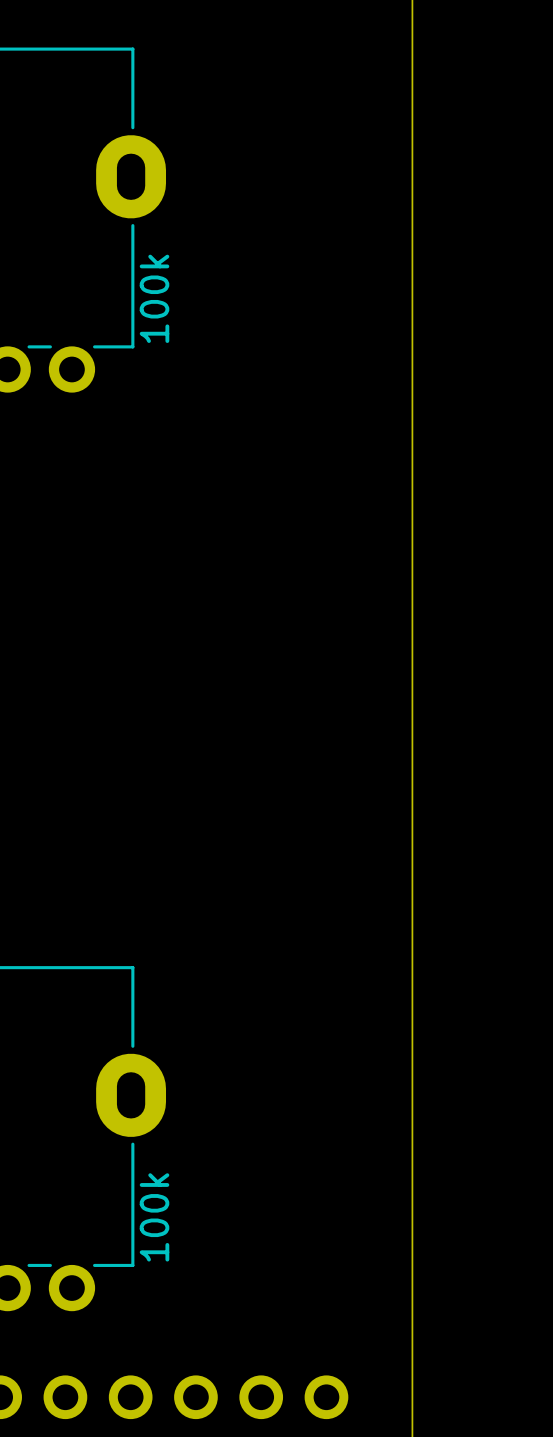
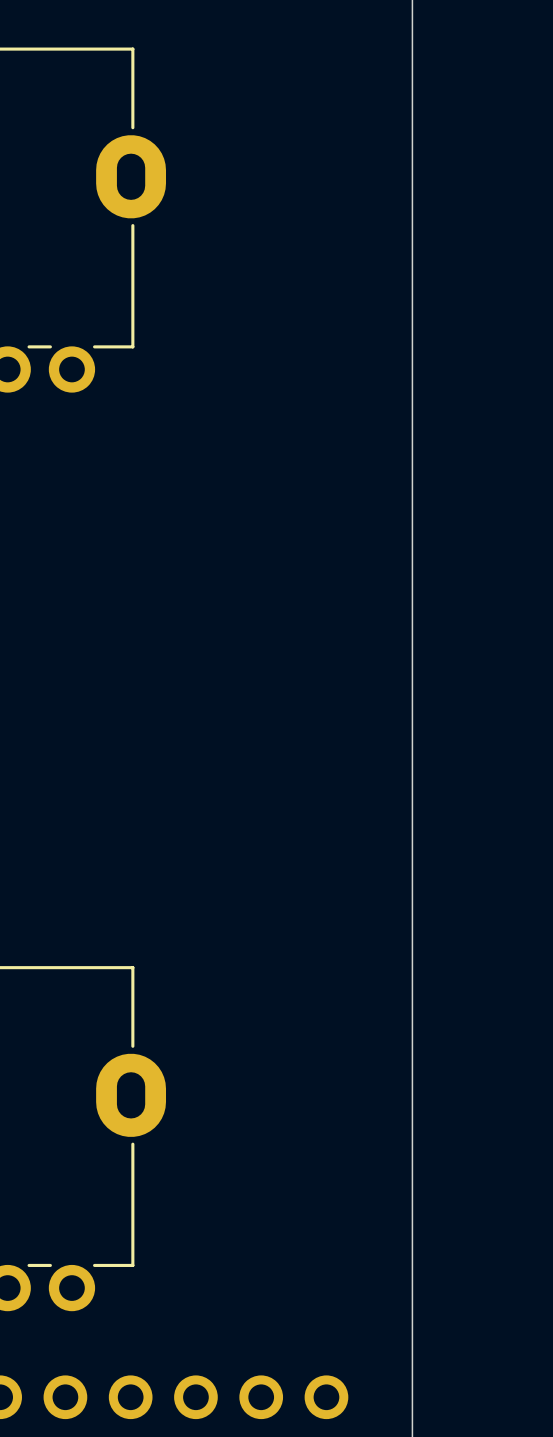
part value: 100k (154, 298) -> none
part value: 100k (154, 1217) -> none

